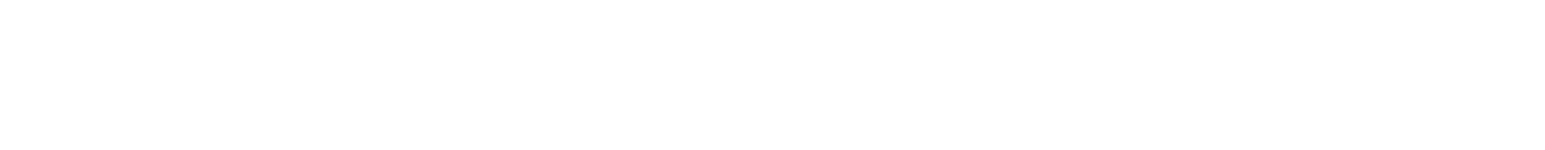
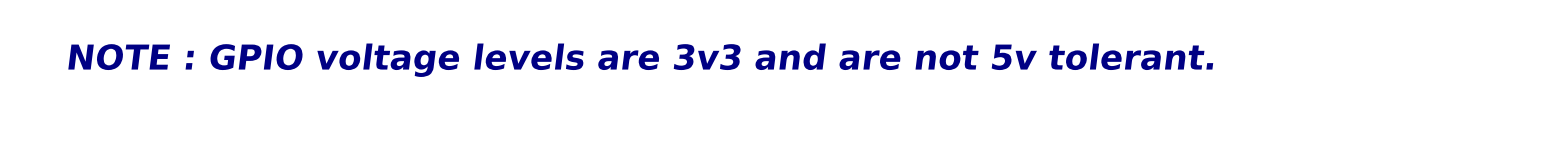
text: none -> NOTE : GPIO voltage levels are 3v3 and are not 5v tolerant. (640, 60)

